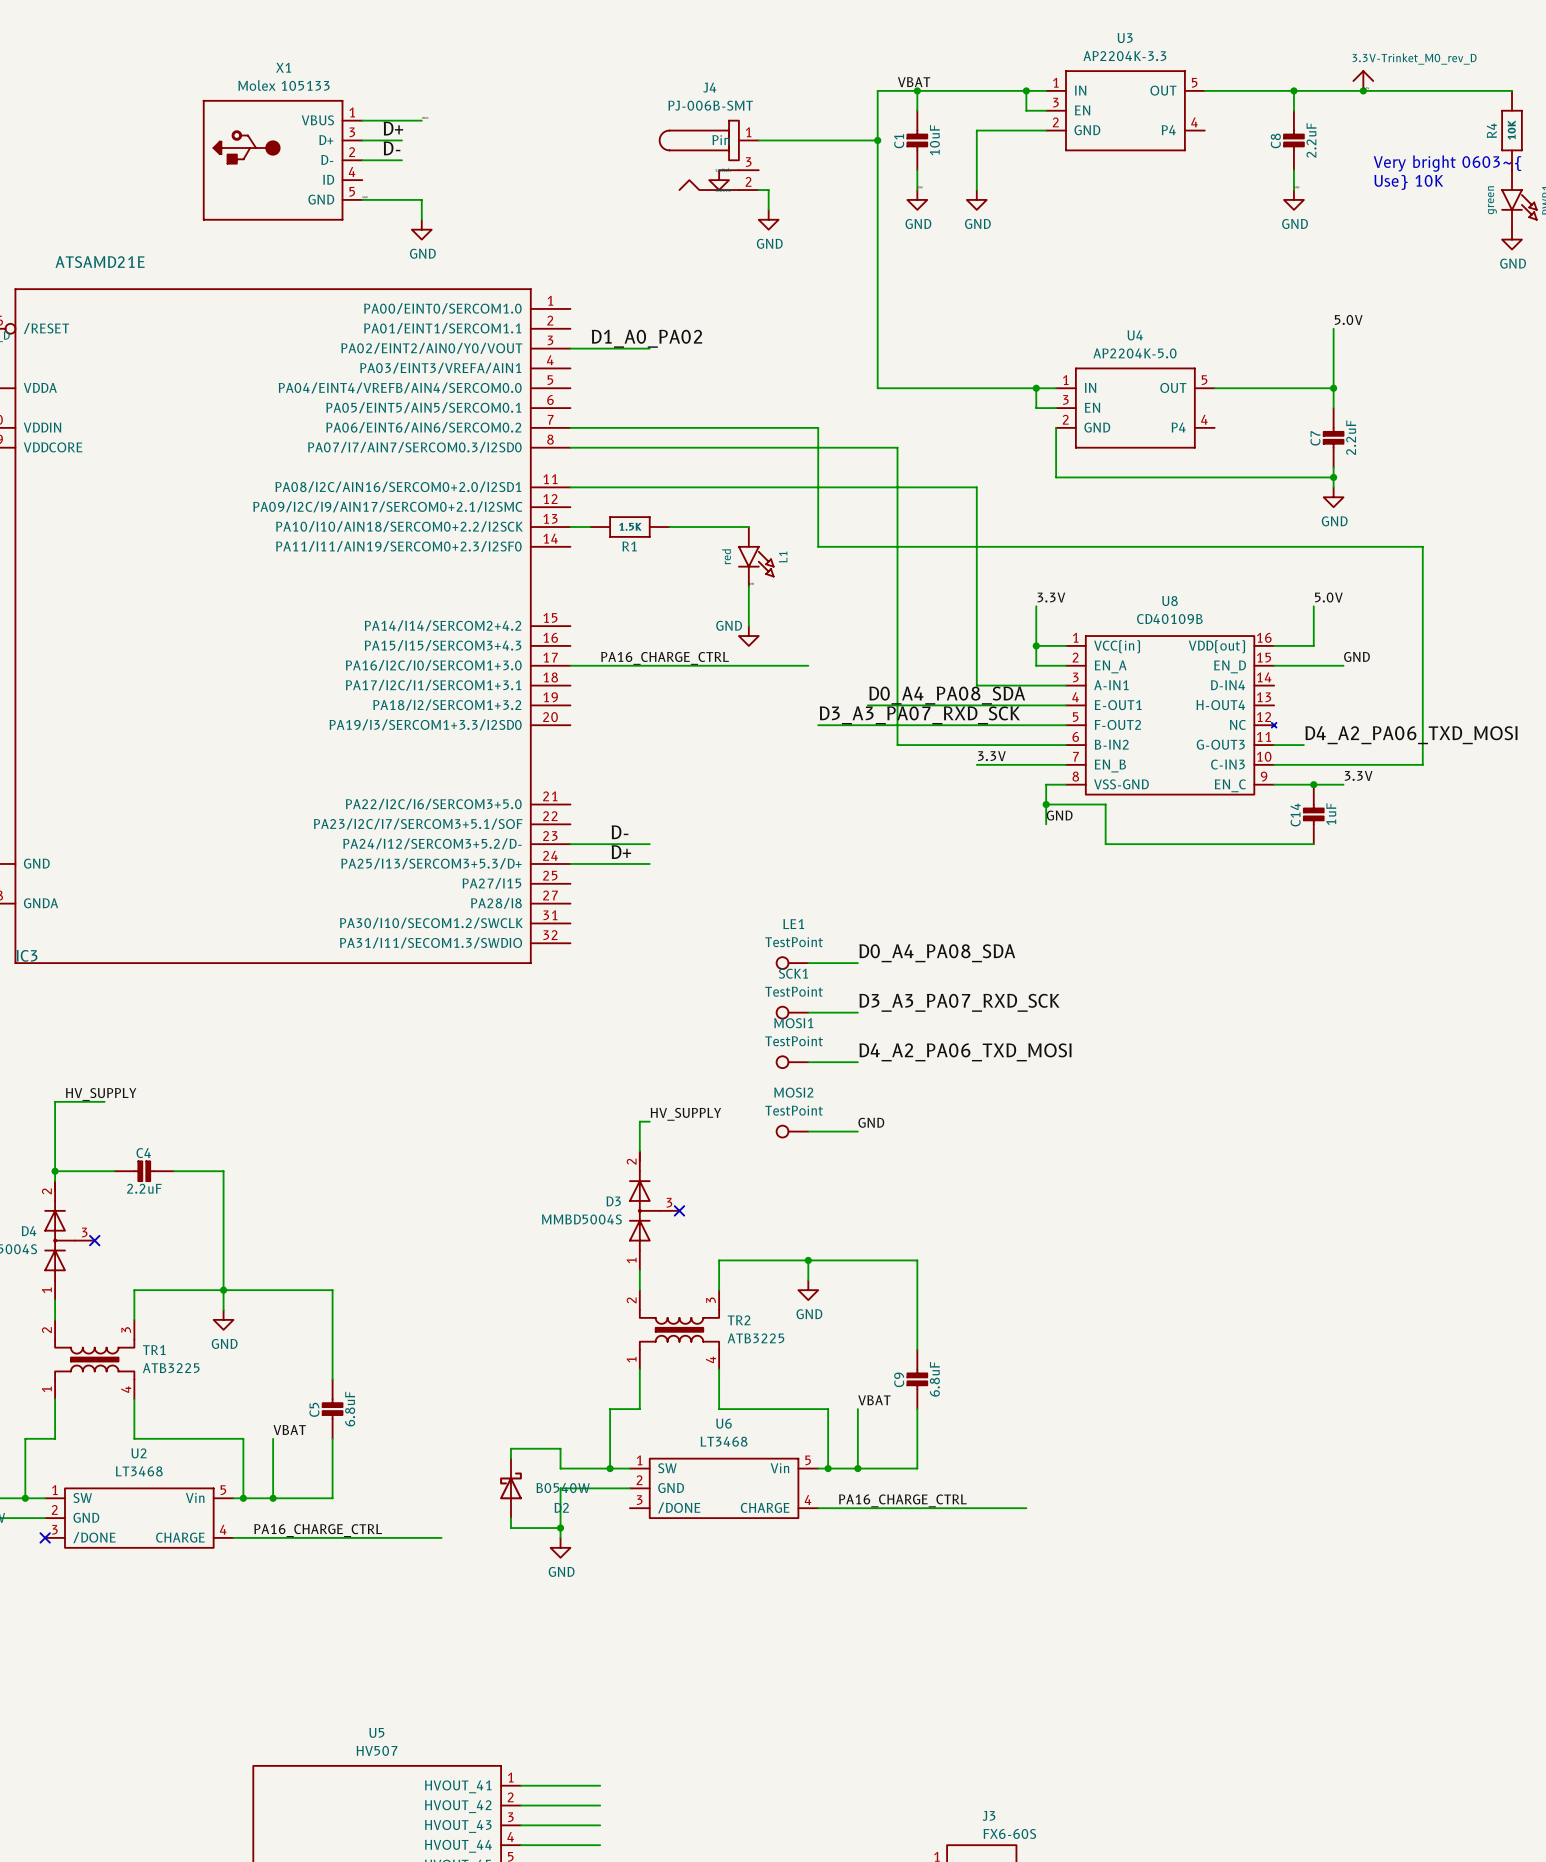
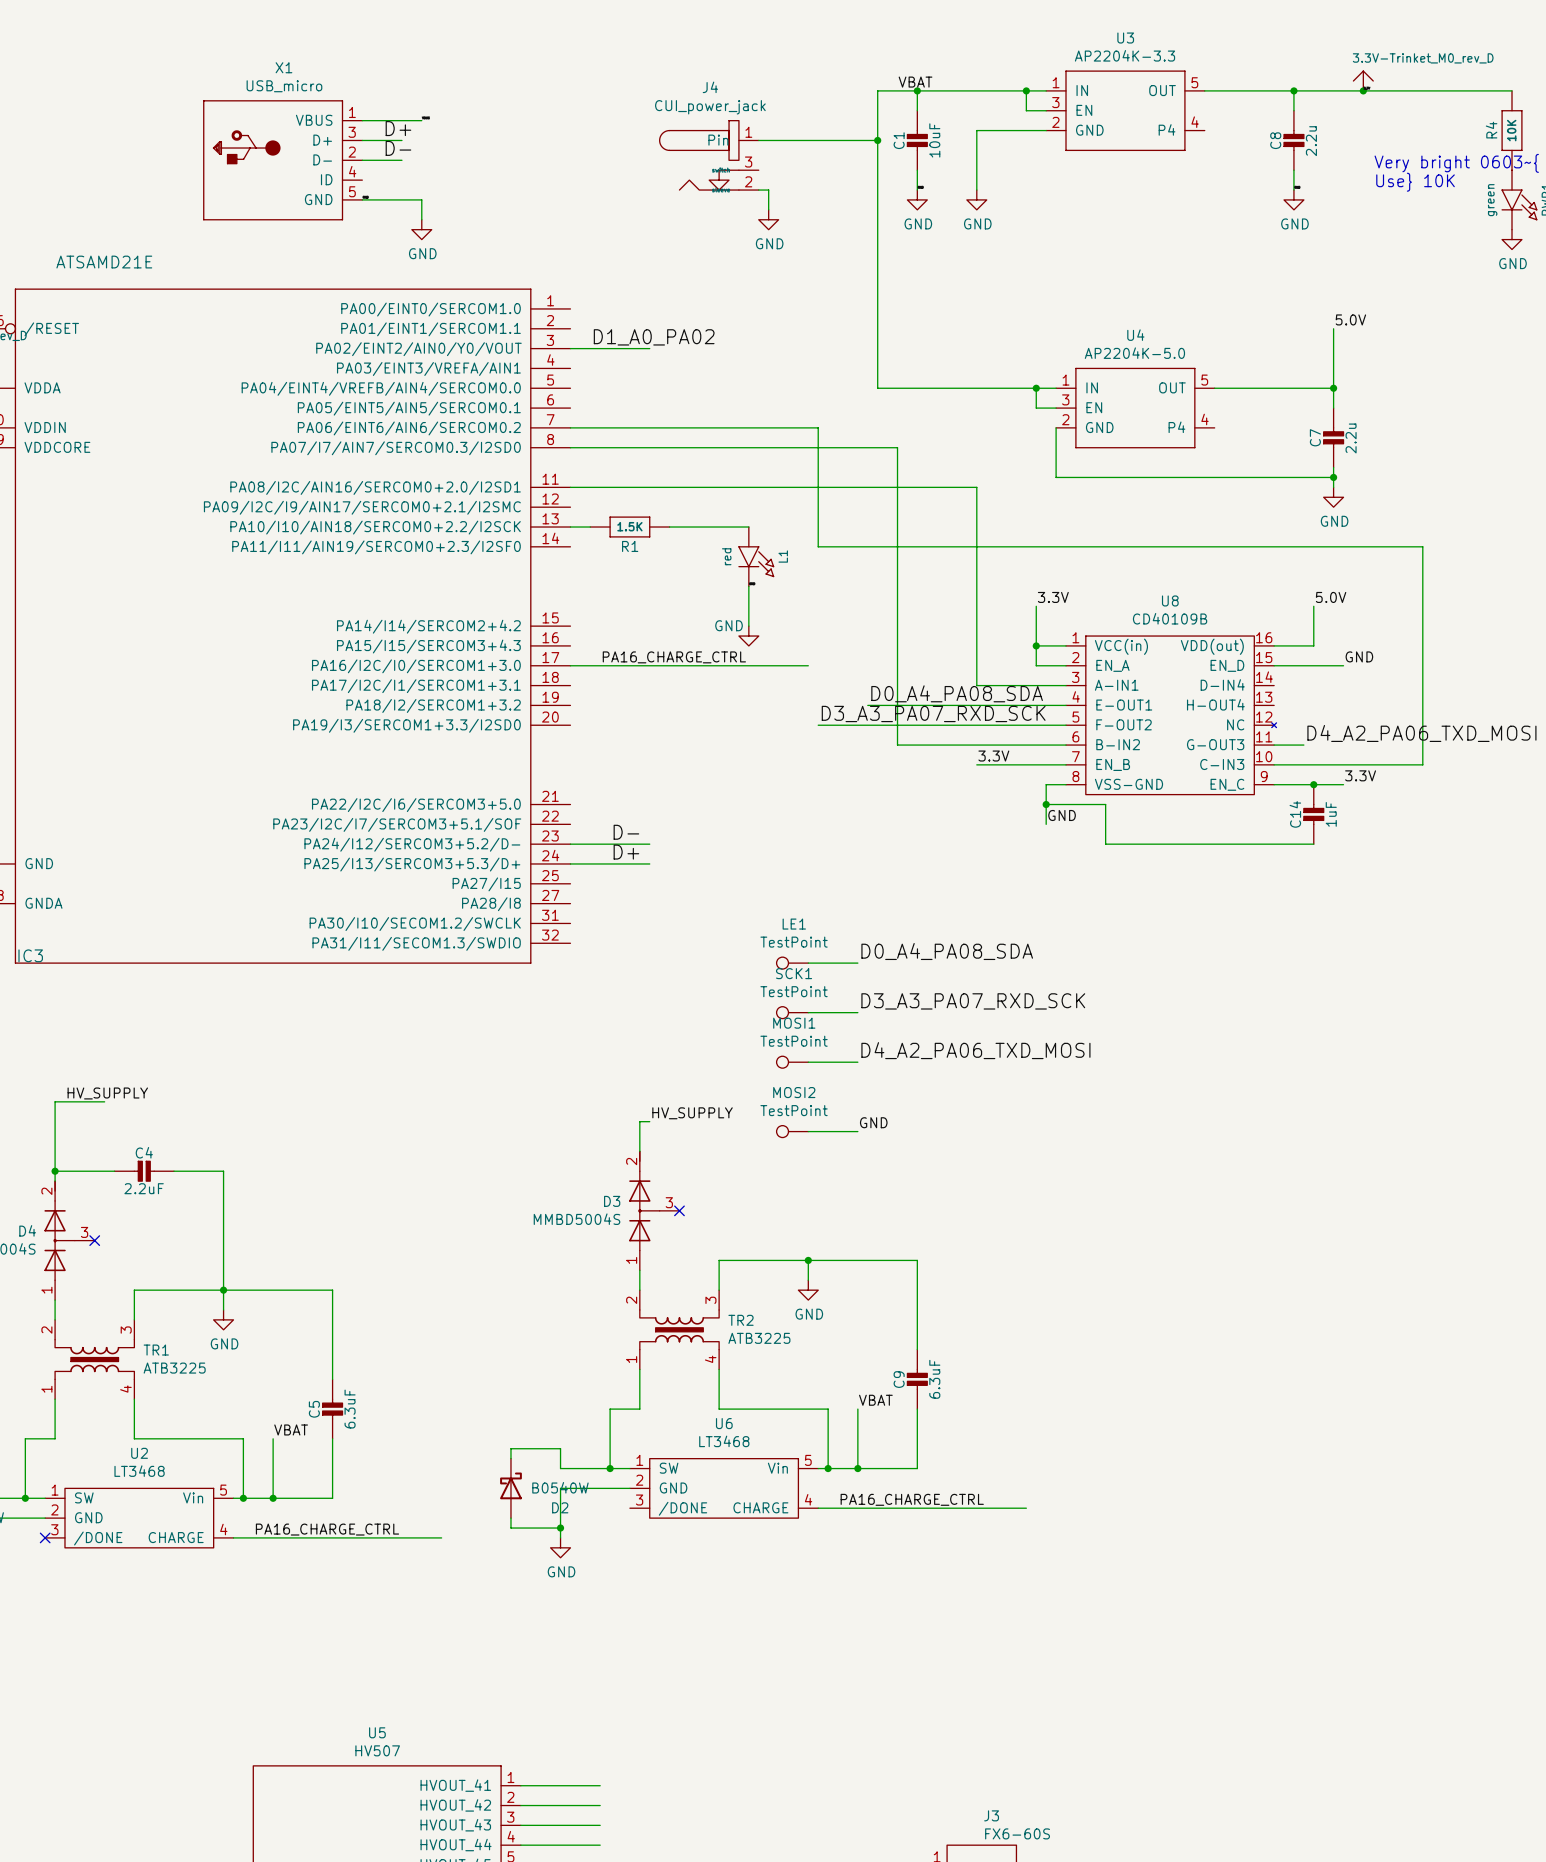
X1 value: Molex 105133 (283, 85) -> USB_micro (284, 86)
J4 value: PJ-006B-SMT (710, 105) -> CUI_power_jack (710, 107)
C8 value: 2.2uF (1311, 140) -> 2.2u (1311, 141)
C7 value: 2.2uF (1351, 437) -> 2.2u (1351, 438)
C9 value: 6.8uF (934, 1379) -> 6.3uF (934, 1379)
C5 value: 6.8uF (350, 1409) -> 6.3uF (350, 1409)

